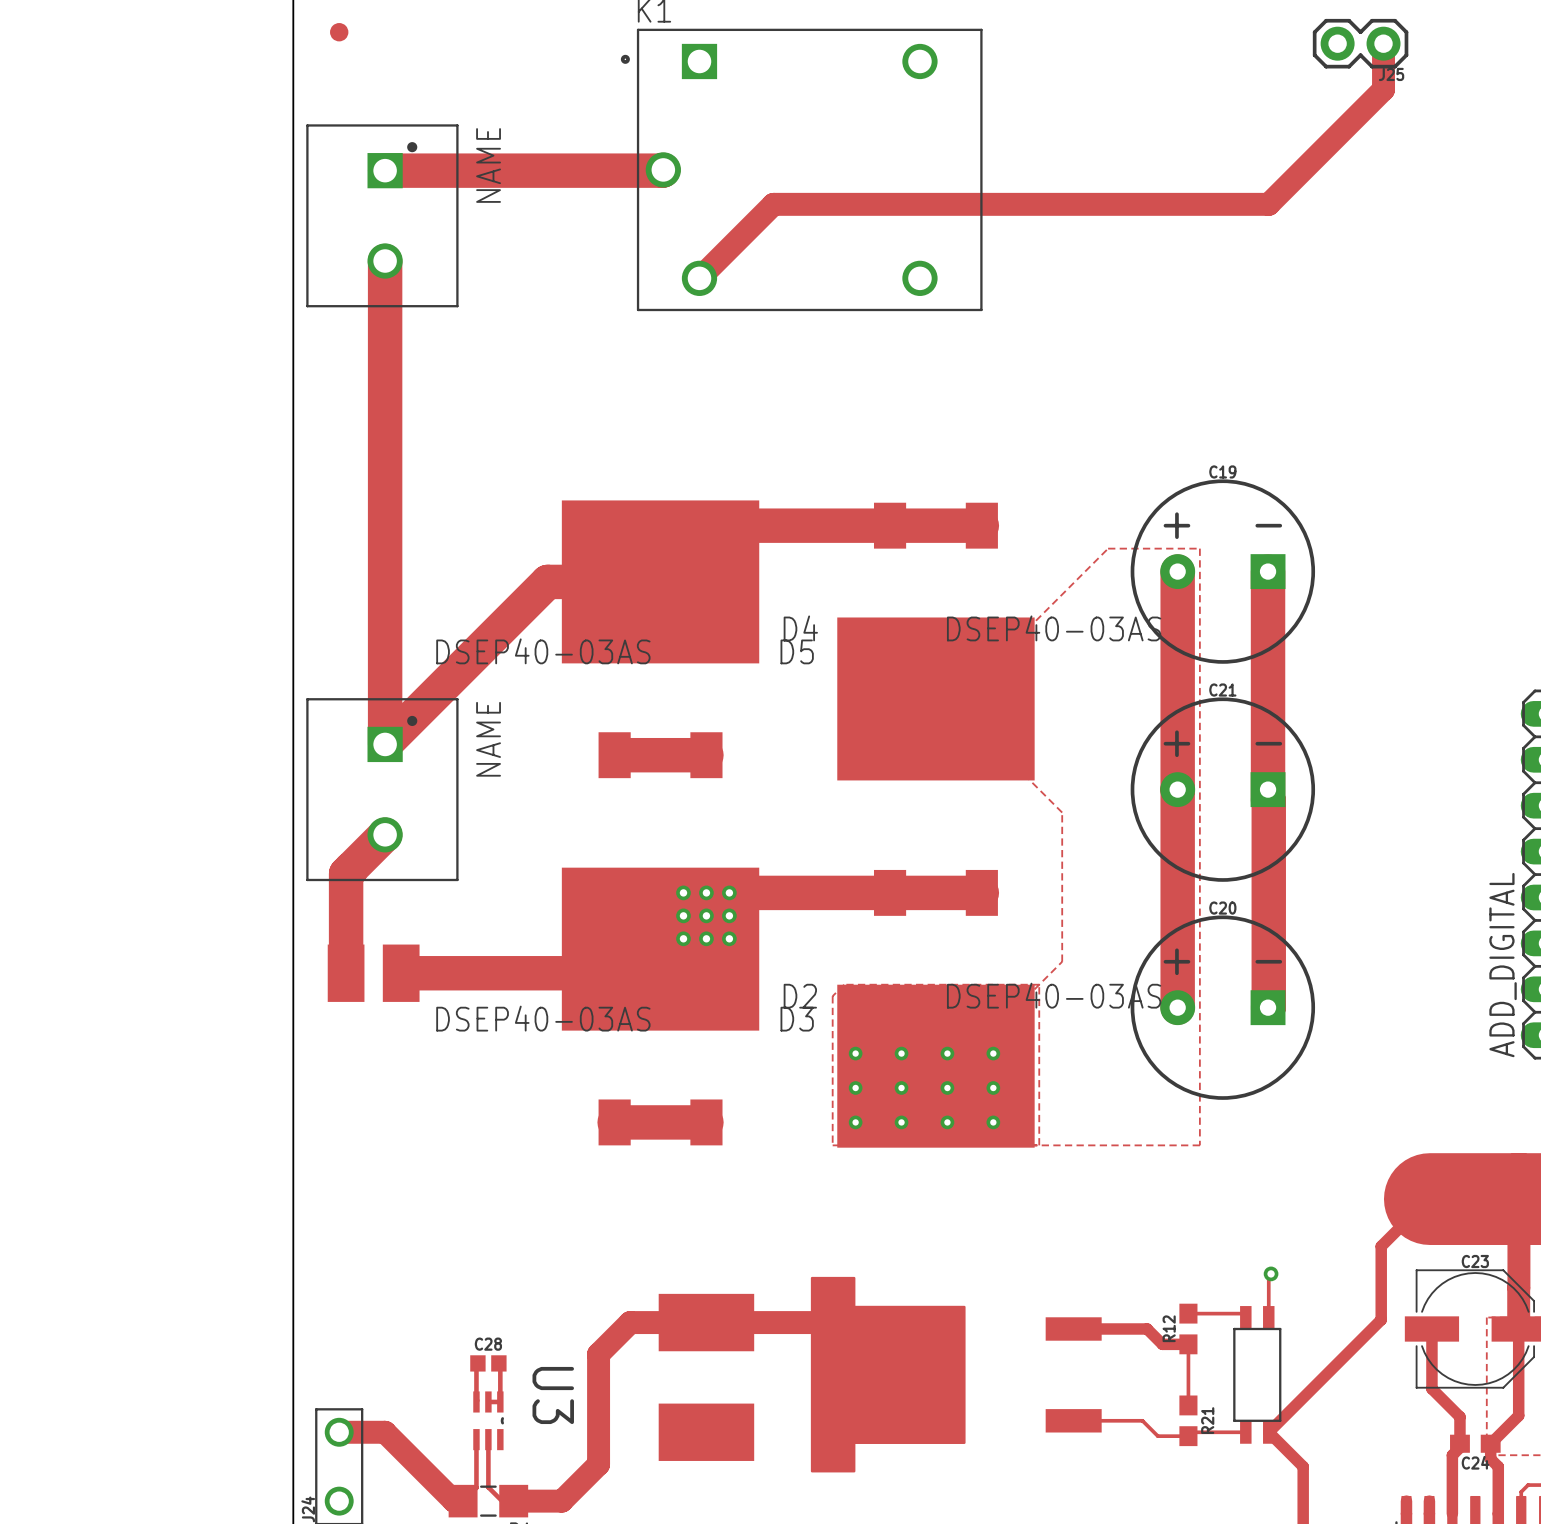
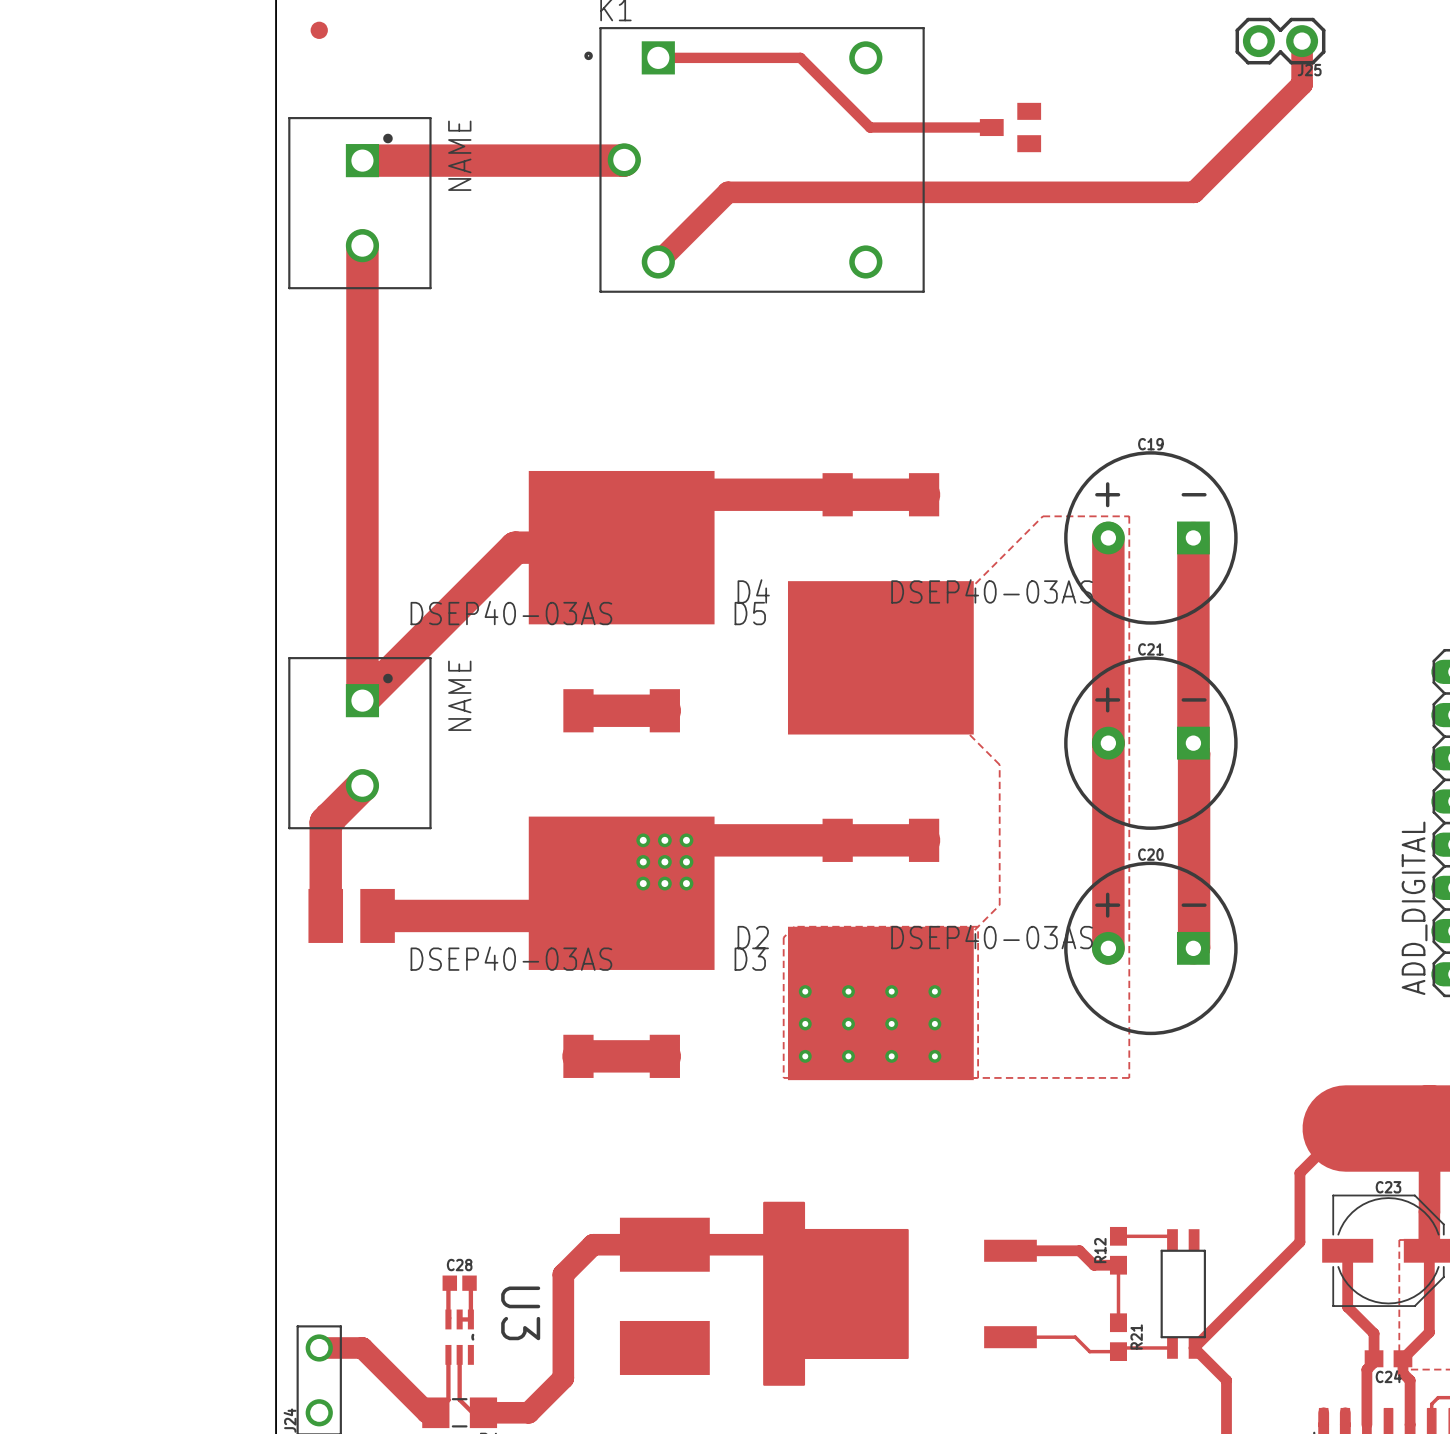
track: none -> (658, 57) (800, 57) (870, 127) (991, 127)
part: none -> (1010, 127)
track: (1271, 1273) (1268, 1276) (1268, 1317) -> none
via: (1271, 1273) -> none

